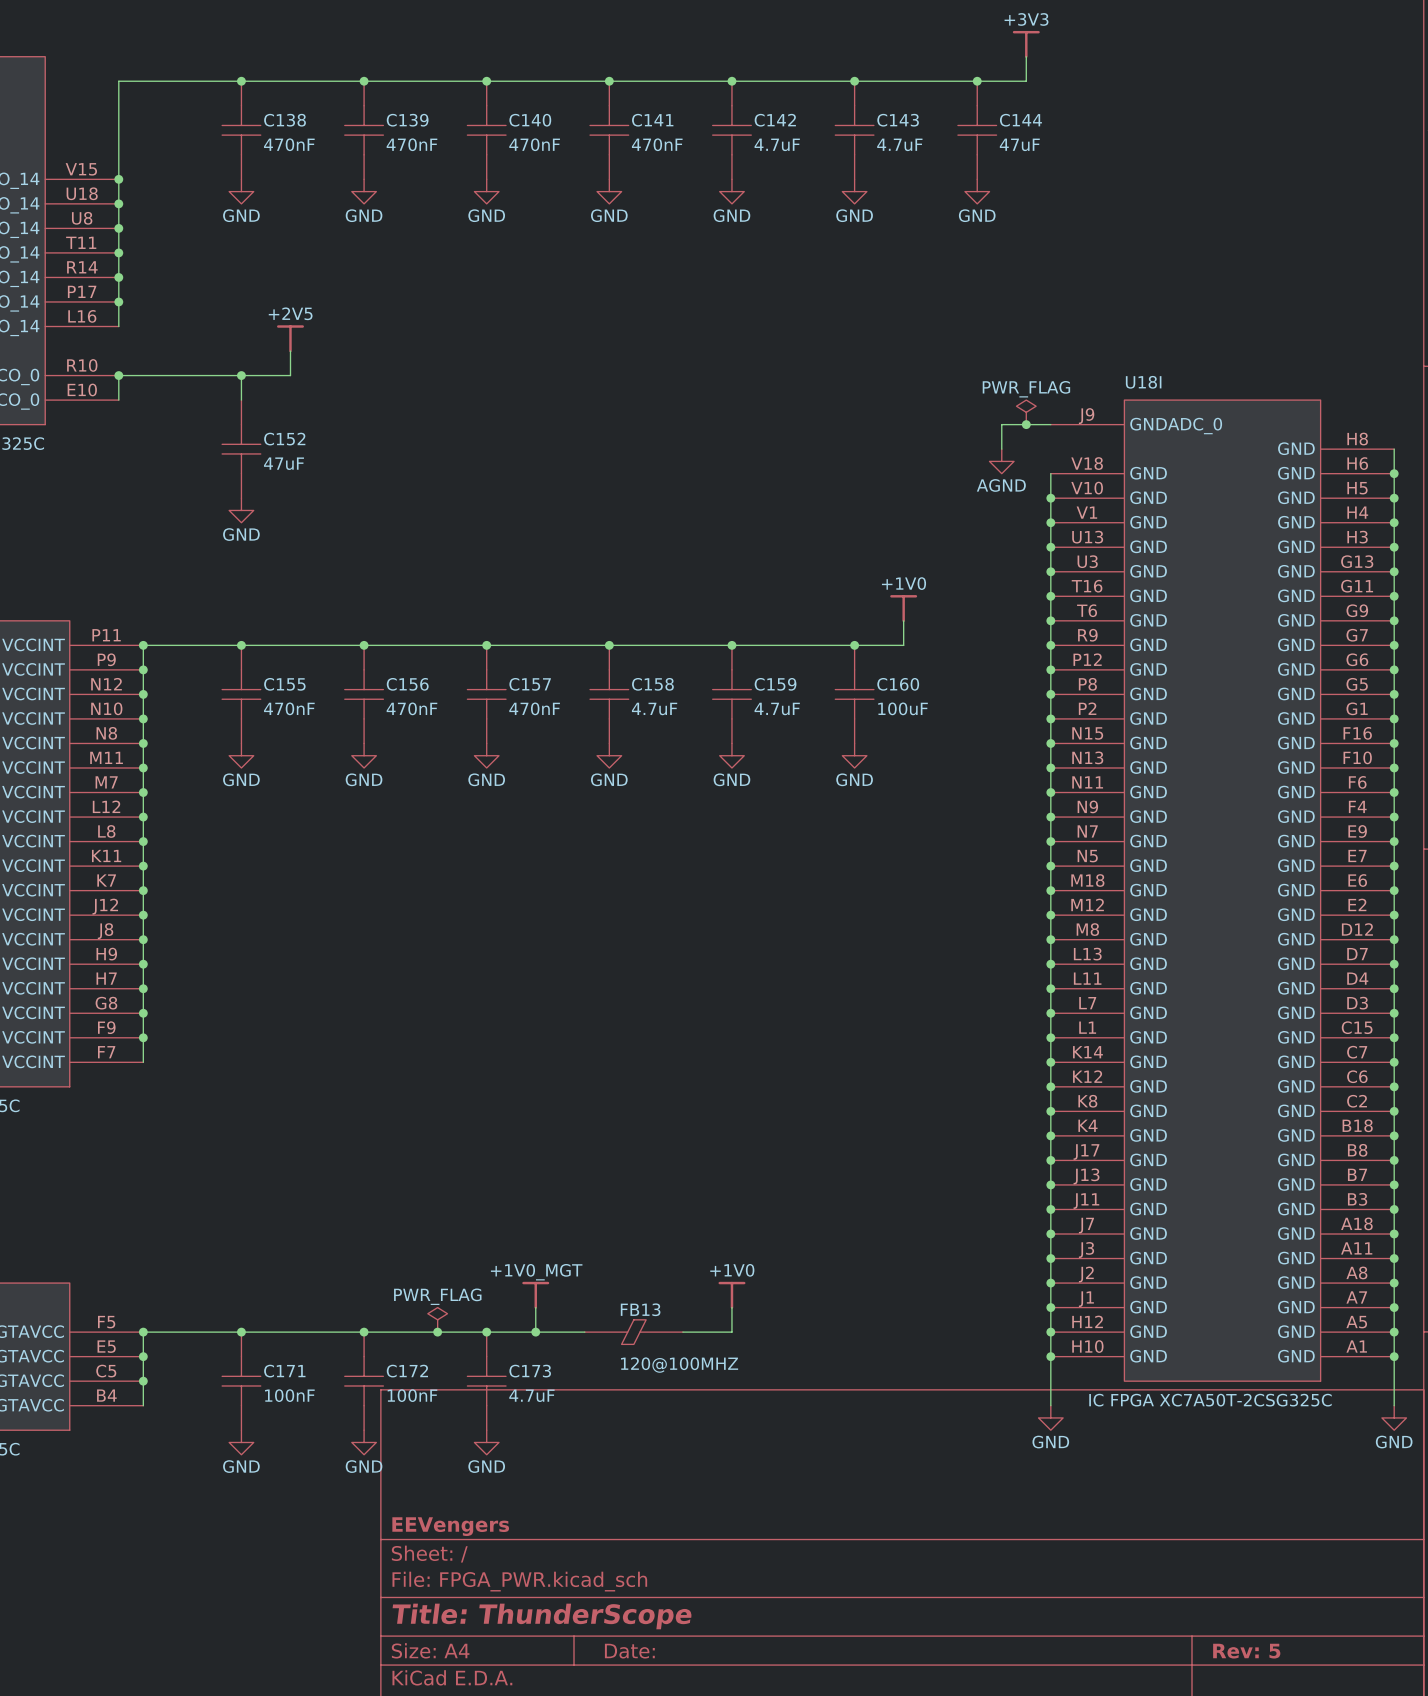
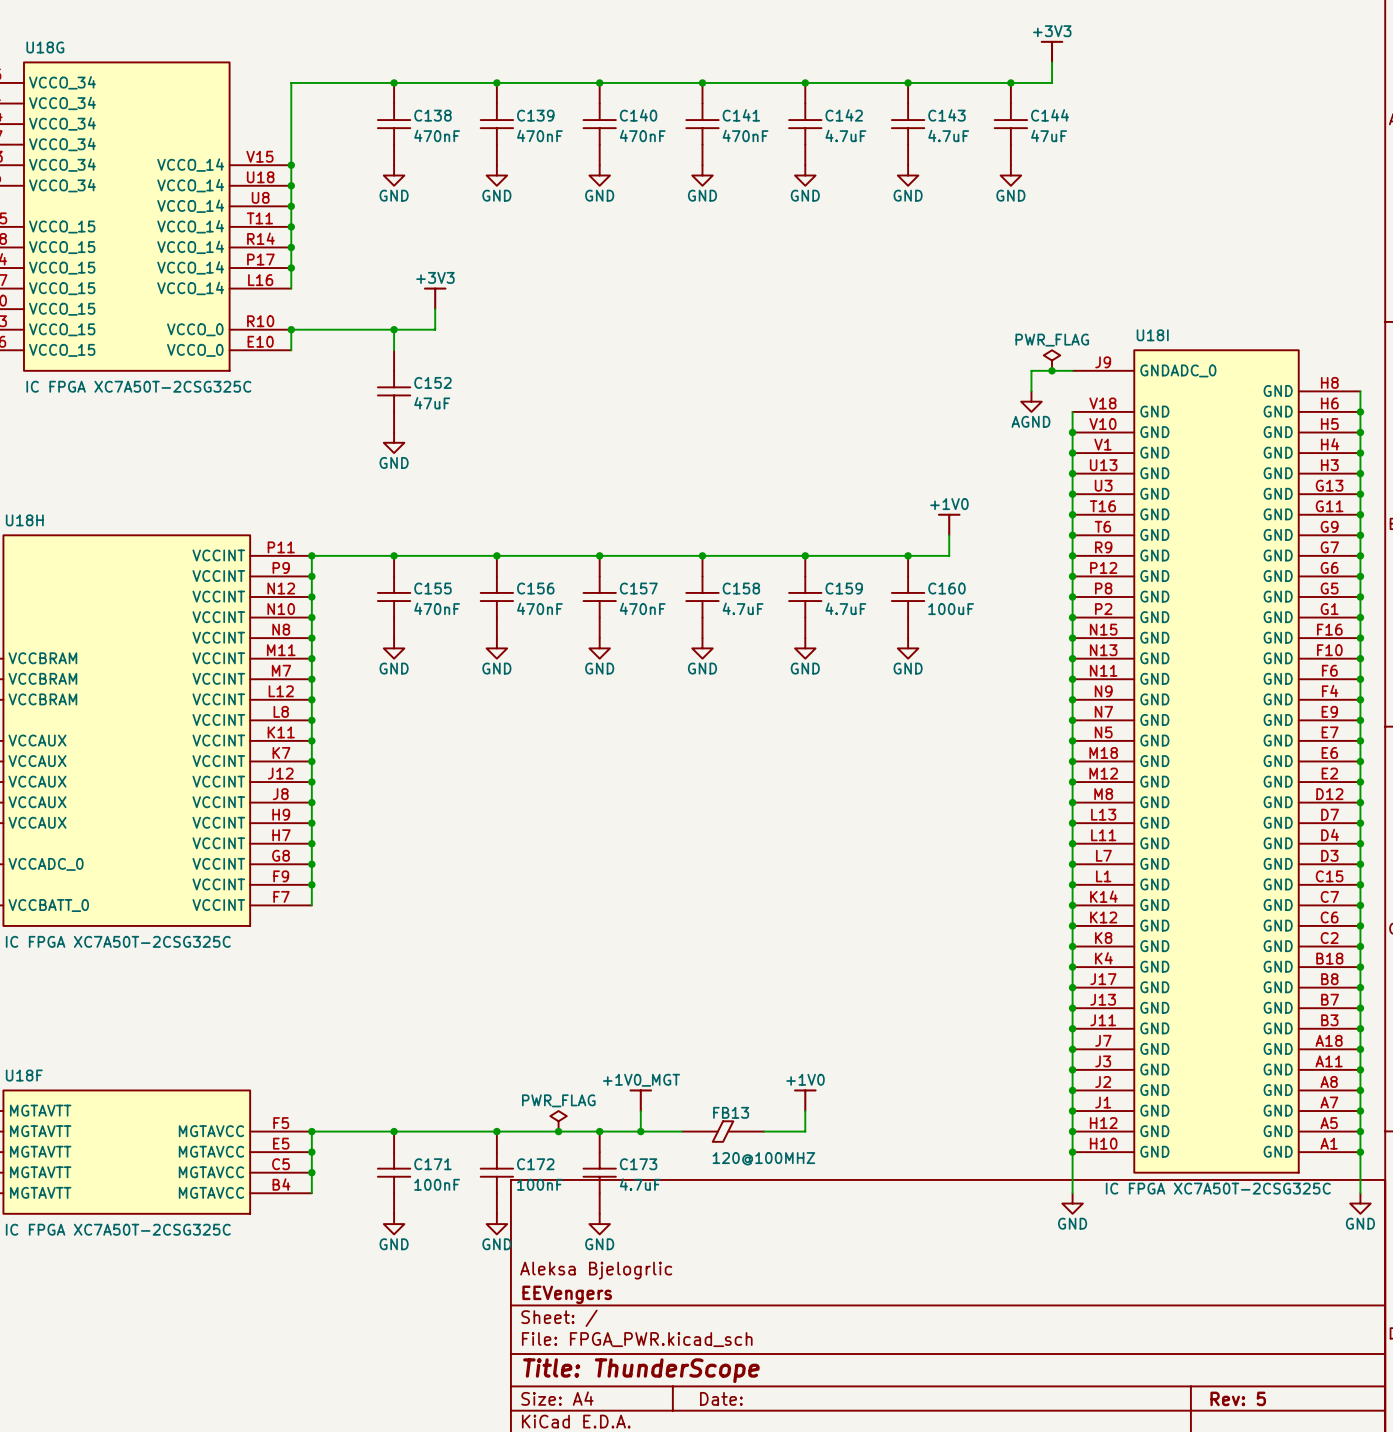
power symbol: +2V5 (290, 338) -> +3V3 (435, 298)
title block: none -> Aleksa Bjelogrlic (596, 1270)

